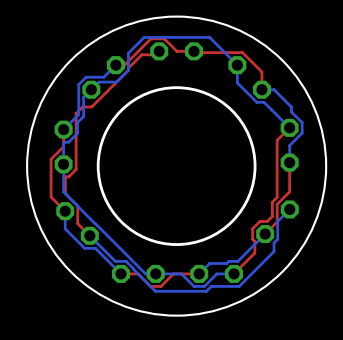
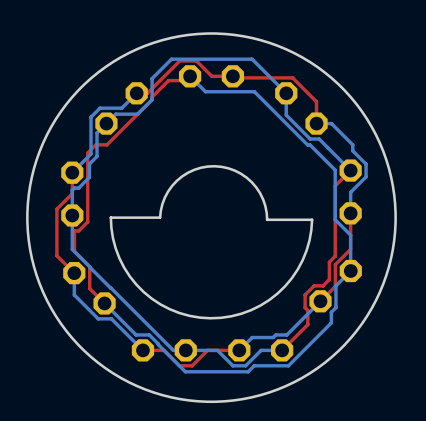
bottom track: none -> (190, 76) (205, 91) (254, 91) (335, 170) (335, 219) (350, 235) (350, 271)
round board edge: [96, 86, 257, 246] -> none
board edge: none -> (160, 217) (110, 217) (113, 238) (119, 258) (129, 276) (151, 298) (179, 313) (210, 318) (241, 313) (260, 305) (277, 293) (291, 278) (302, 260) (309, 240) (312, 219) (267, 219) (263, 199) (251, 182) (234, 170) (214, 166) (194, 169) (176, 180) (164, 197) (160, 217)

